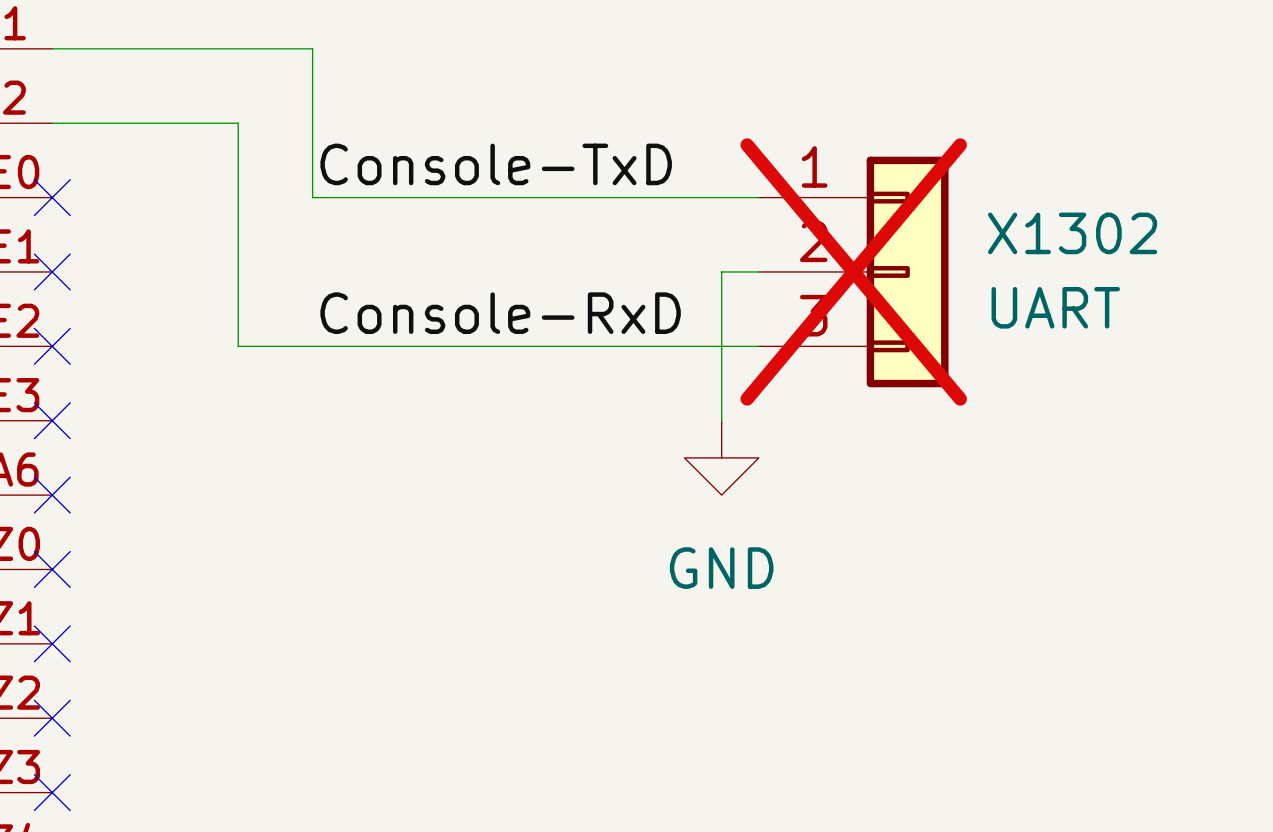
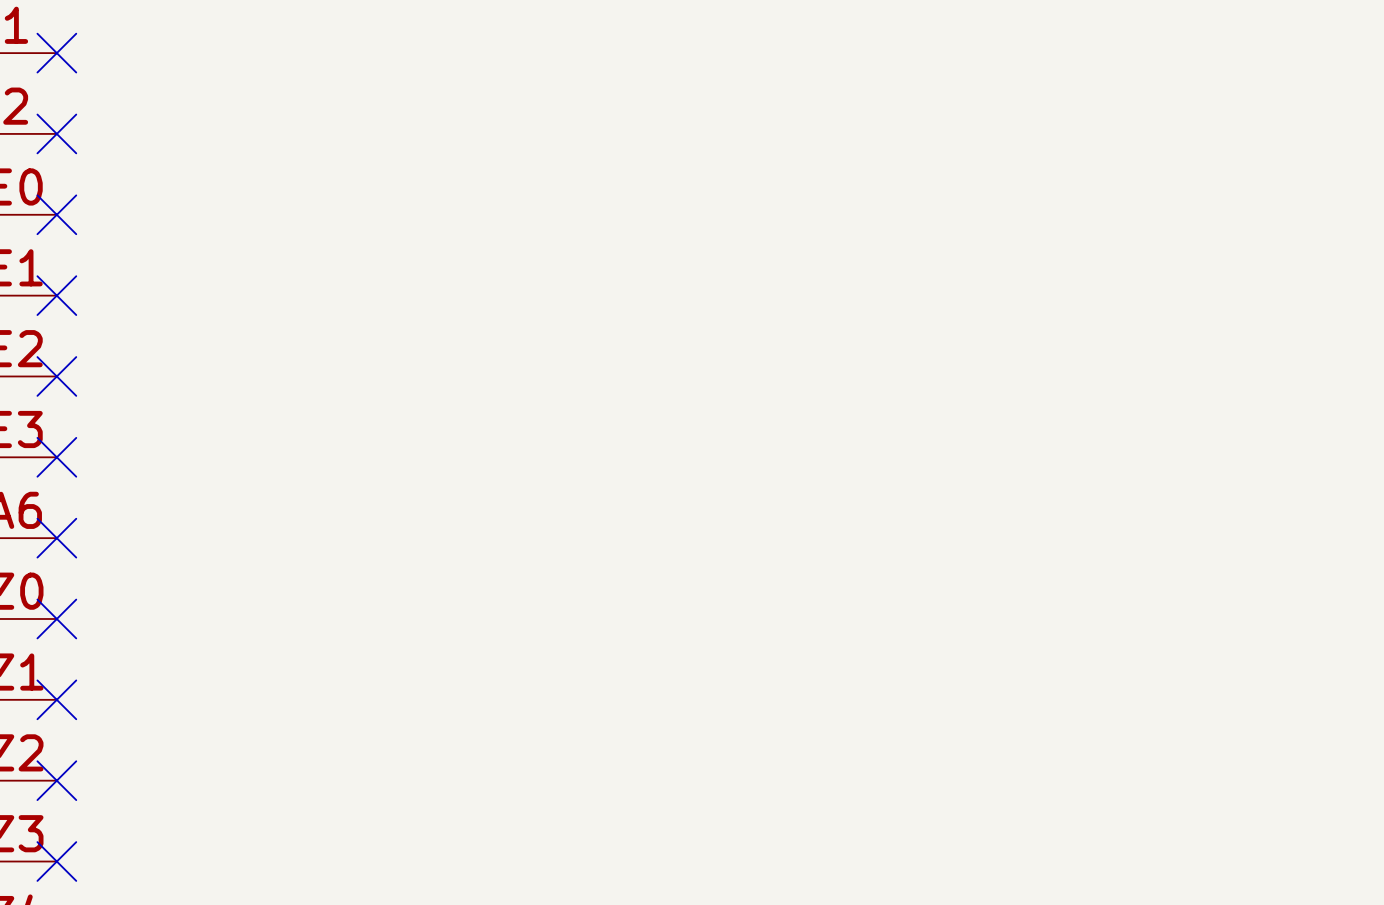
wire: (52, 48) (312, 48) (312, 197) (758, 197) -> none
no-connect mark: none -> (56, 53)
wire: (52, 123) (238, 123) (238, 346) (758, 346) -> none
no-connect mark: none -> (56, 133)
label: Console-TxD (496, 164) -> none
wire: (758, 271) (721, 271) (721, 420) -> none
X1302: UART (853, 271) -> none
label: Console-RxD (500, 313) -> none
power symbol: GND (721, 457) -> none

